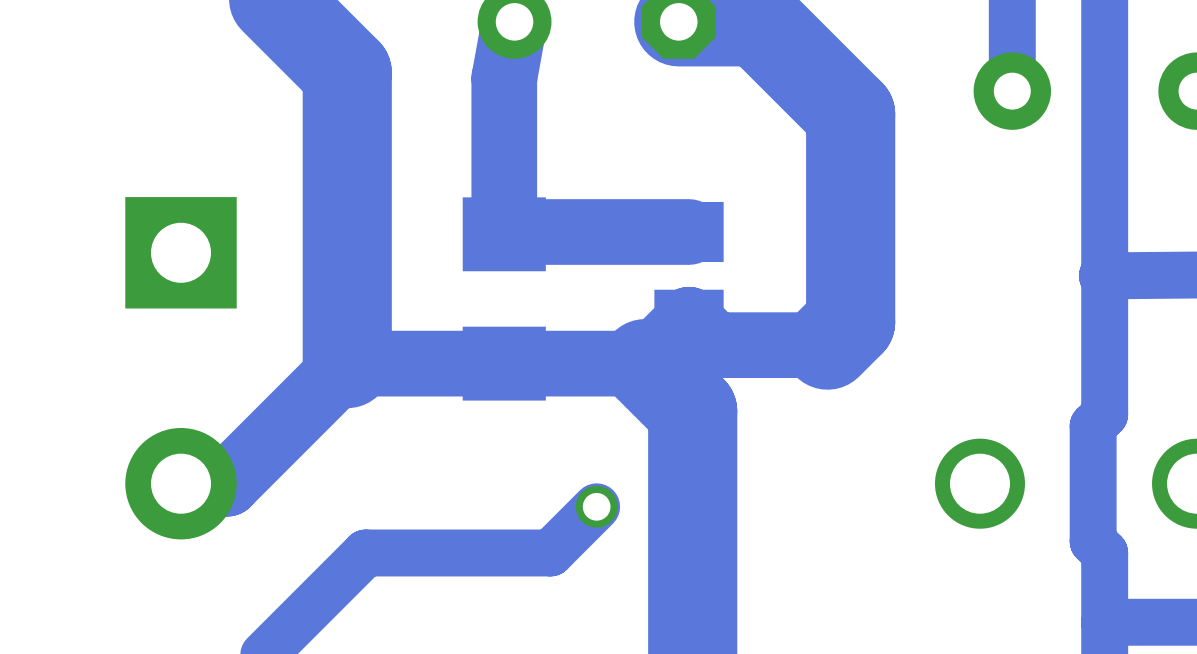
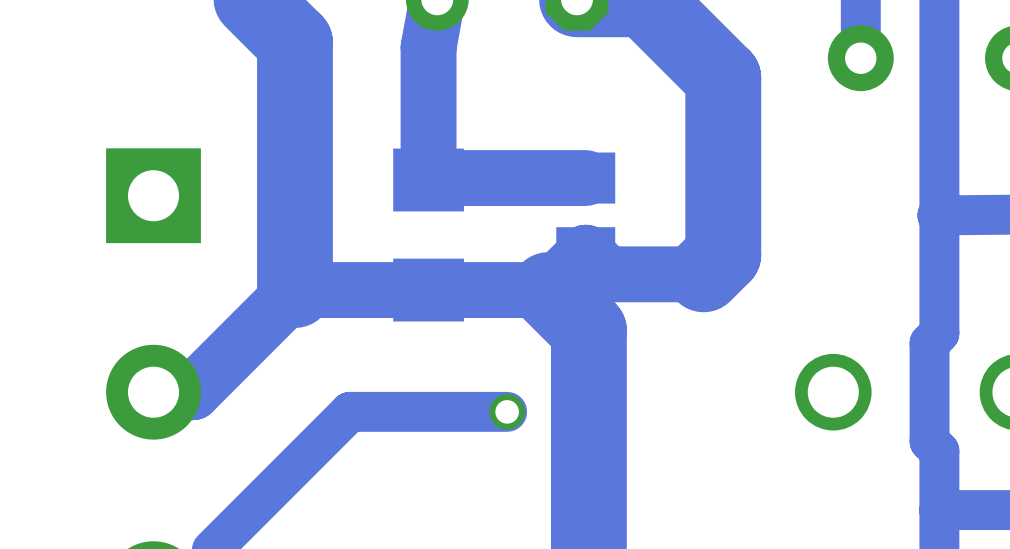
track: (596, 506) (550, 552) (365, 552) -> (507, 411) (349, 411) (310, 451)

